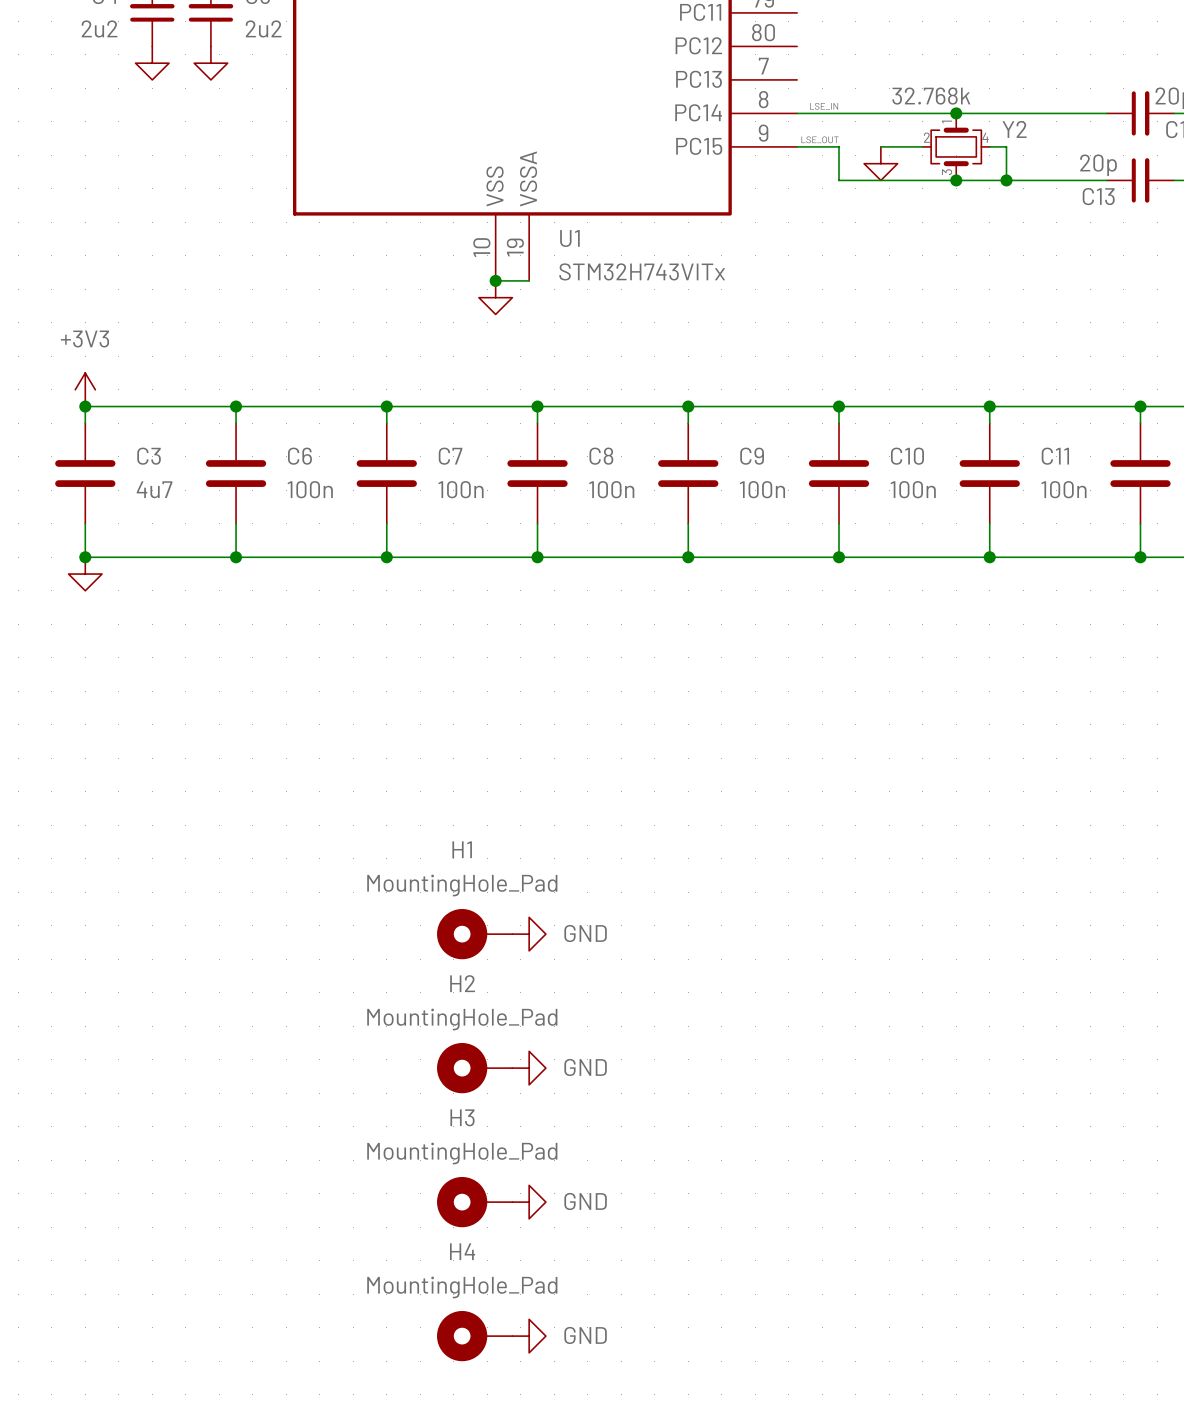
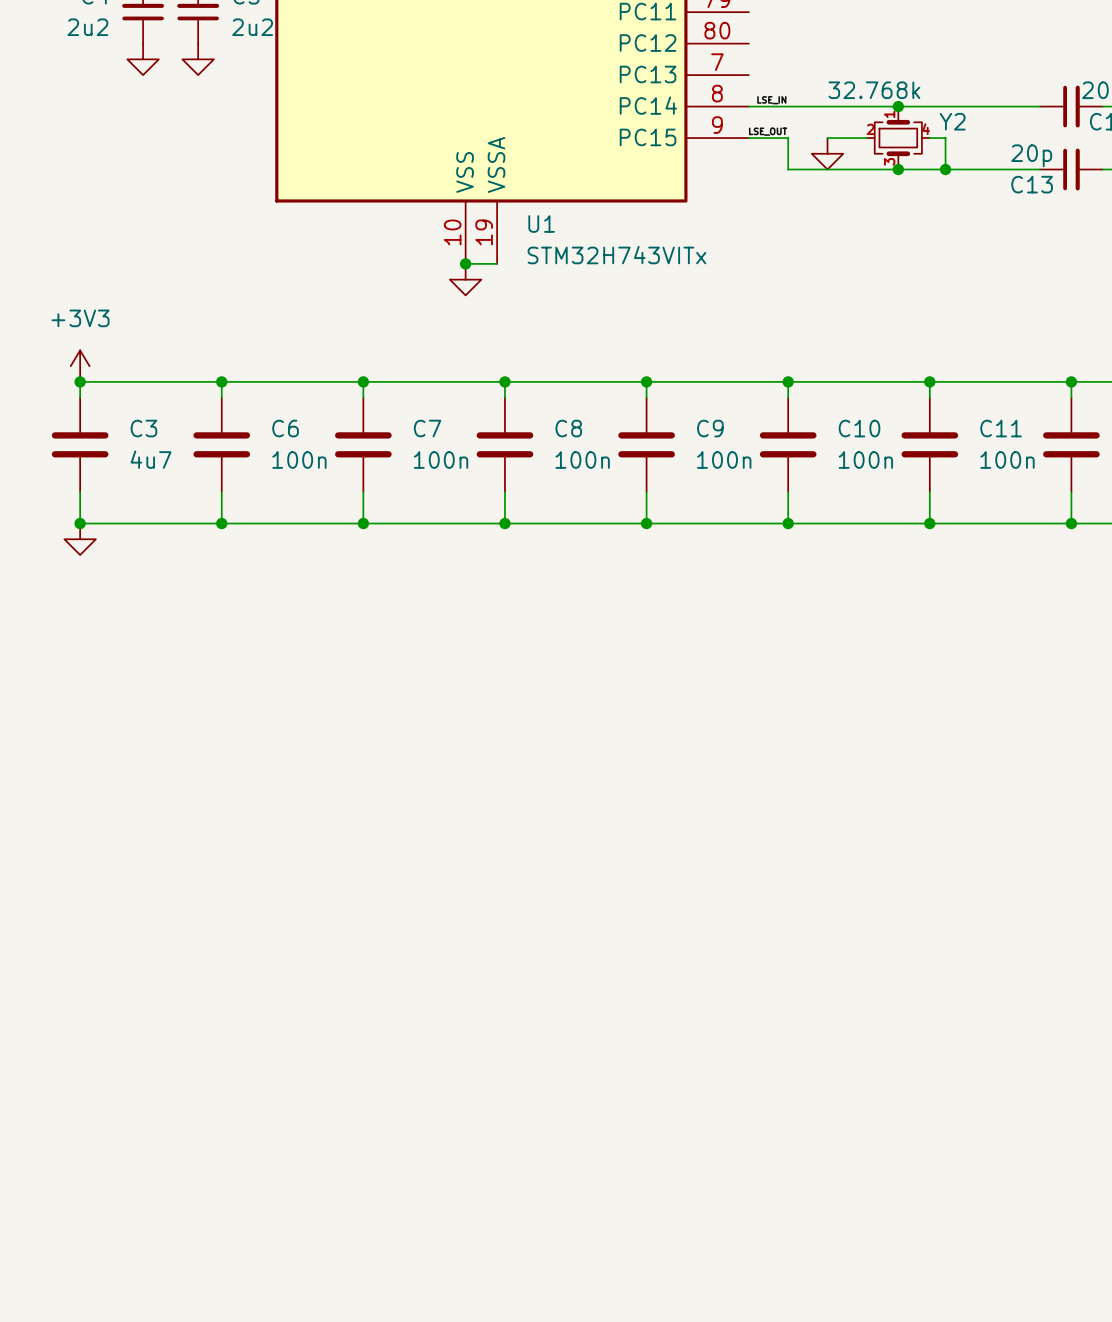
H1: MountingHole_Pad (474, 934) -> none
power symbol: GND (529, 934) -> none
H2: MountingHole_Pad (474, 1068) -> none
power symbol: GND (529, 1068) -> none
H3: MountingHole_Pad (474, 1202) -> none
power symbol: GND (529, 1202) -> none
H4: MountingHole_Pad (474, 1336) -> none
power symbol: GND (529, 1336) -> none

